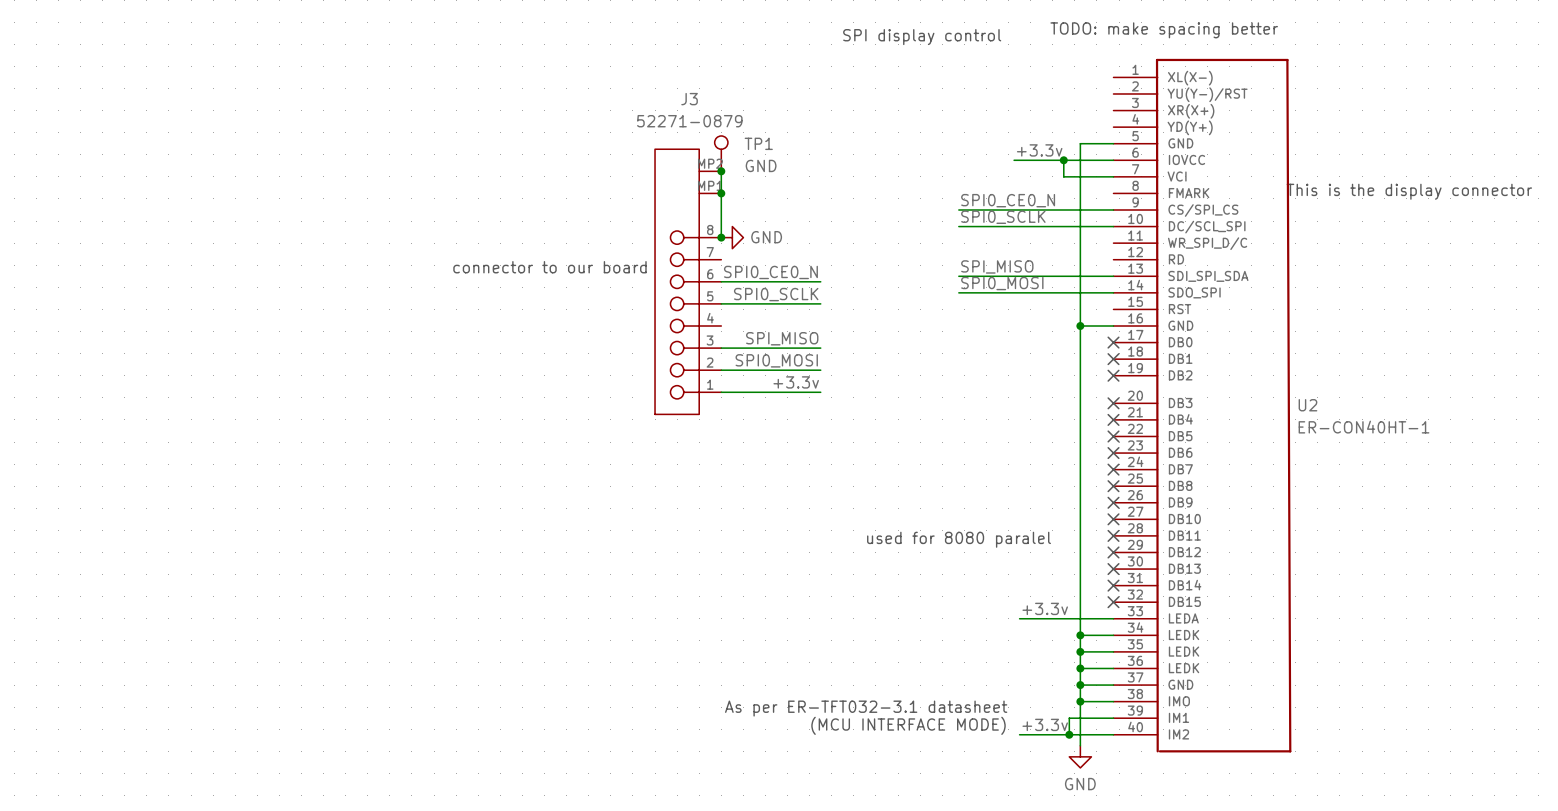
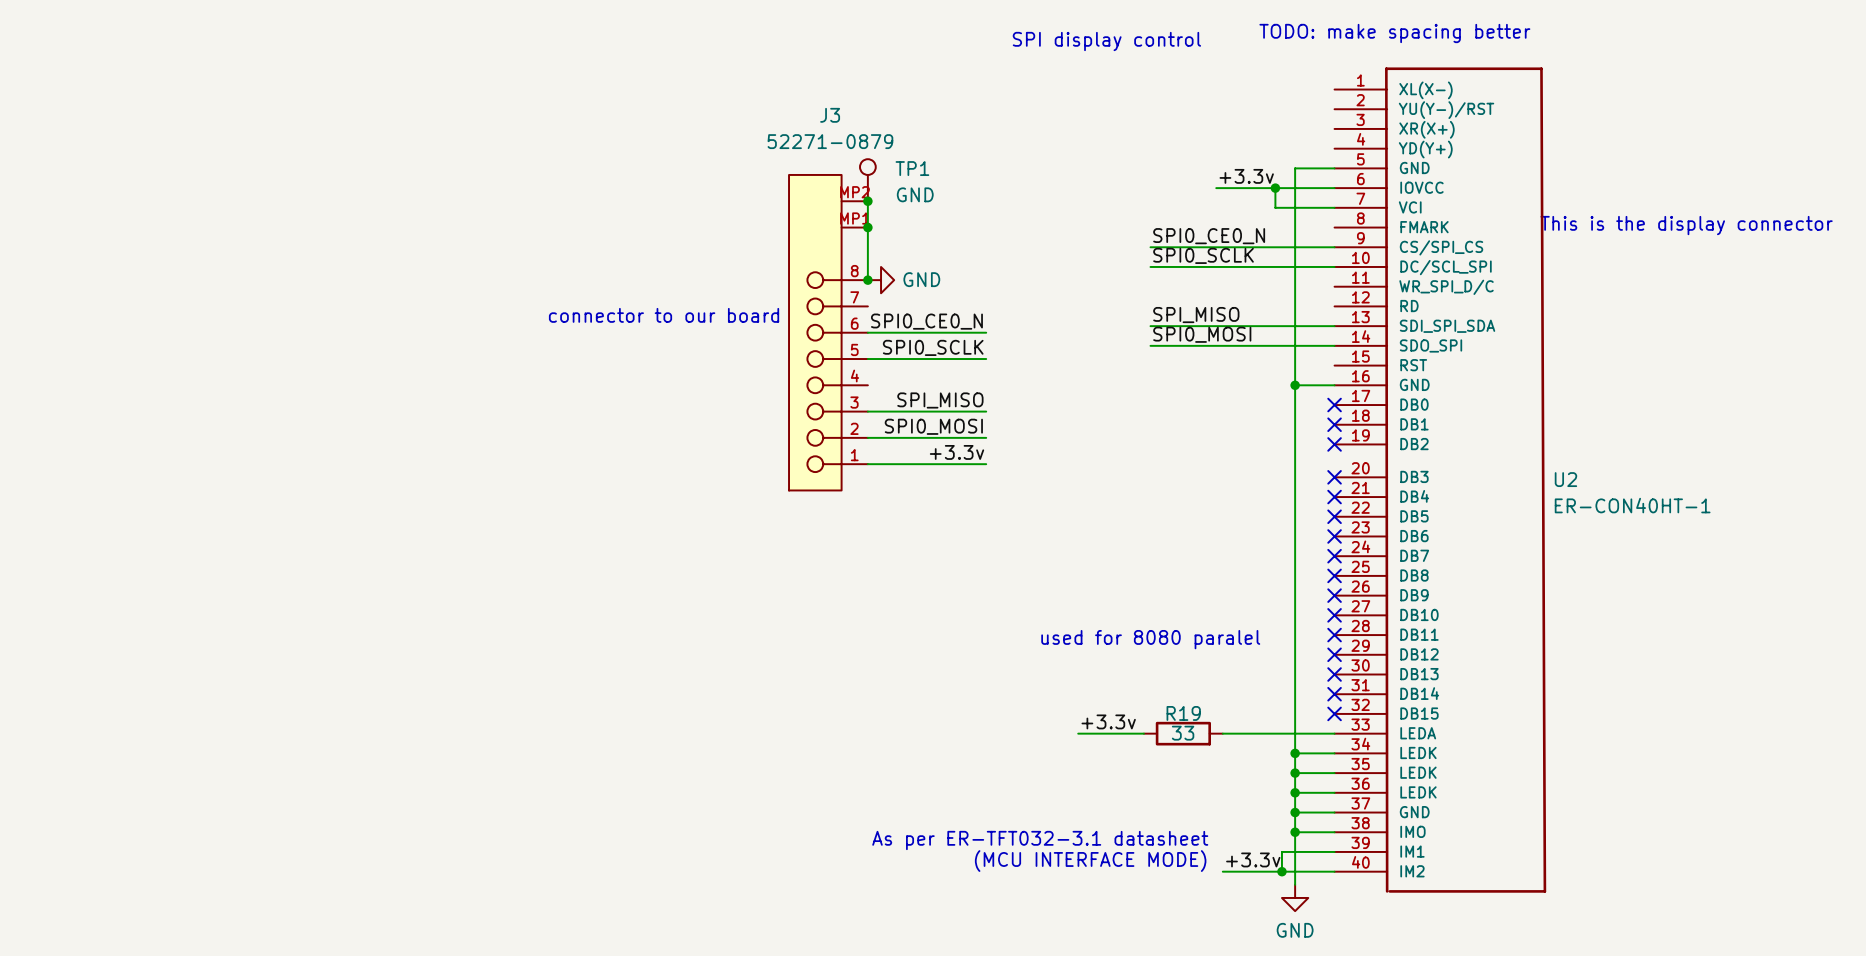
label position: +3.3v (1045, 608) -> +3.3v (1108, 721)
wire: none -> (1078, 733) (1143, 733)
R19: none -> 33 (1183, 733)

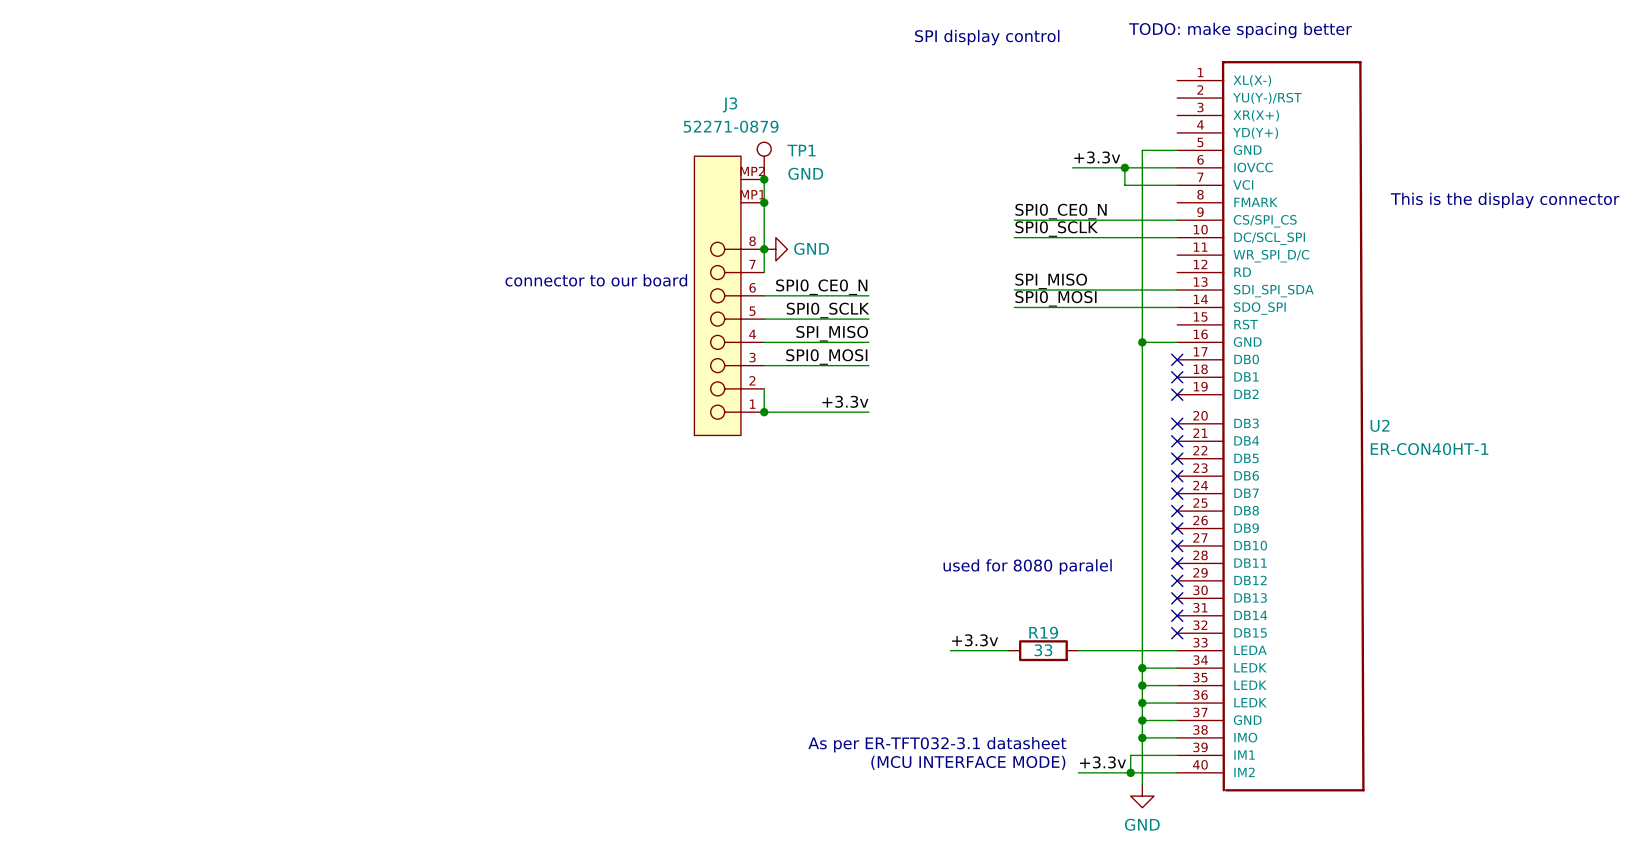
wire: none -> (764, 249) (764, 272)
label: none -> SPI_MISO (832, 333)
wire: none -> (764, 342) (868, 342)
label: SPI_MISO (940, 400) -> SPI0_MOSI (826, 357)
label: SPI0_MOSI (933, 426) -> none
wire: (867, 437) (986, 437) -> (764, 388) (764, 412)
junction: none -> (764, 412)

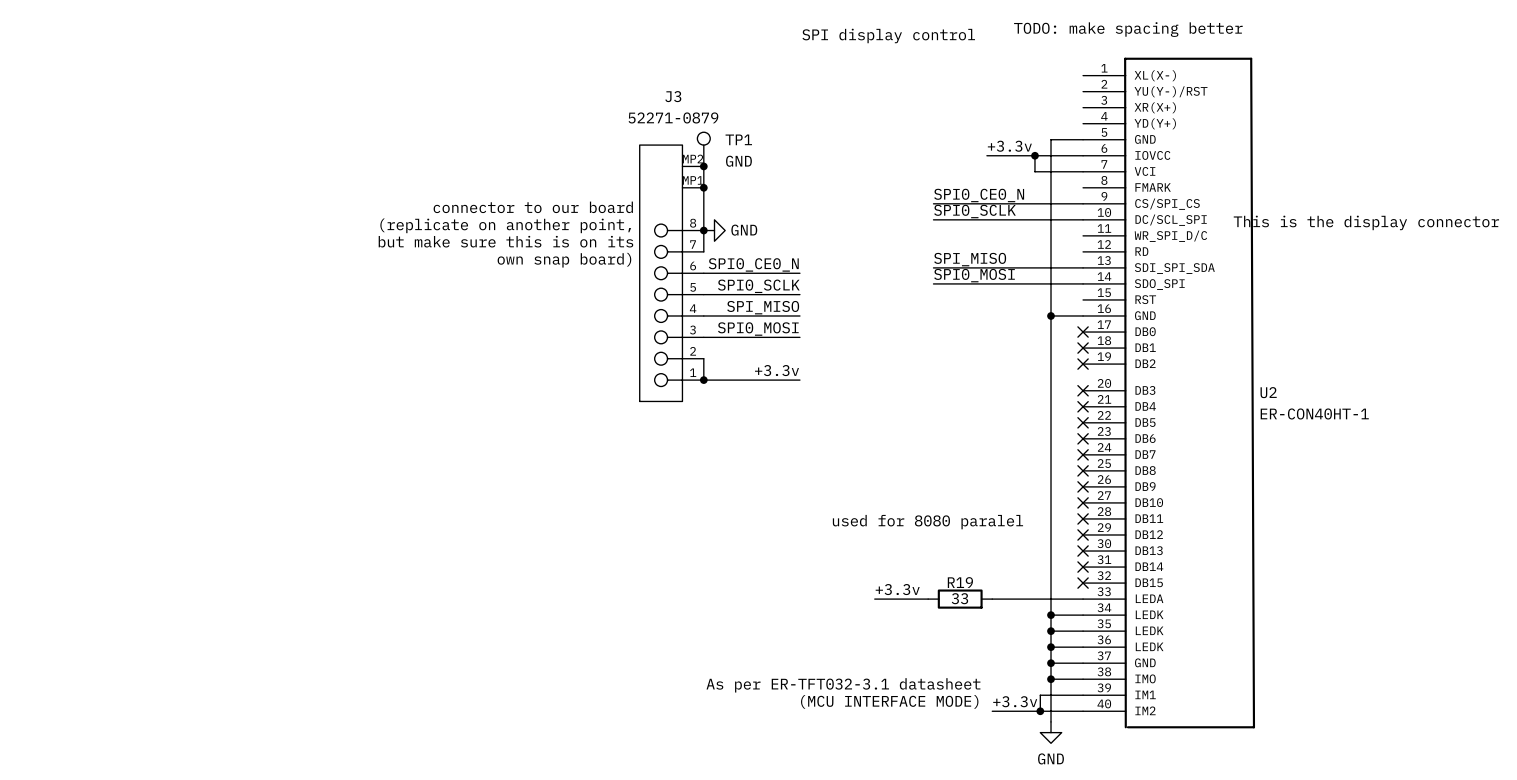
text position: This is the display connector (1505, 200) -> This is the display connector (1366, 222)
text: none -> connector to our board (533, 207)
text: none -> (replicate on another point, (505, 225)
text: none -> but make sure this is on its (505, 241)
text: connector to our board (596, 280) -> own snap board) (564, 260)

